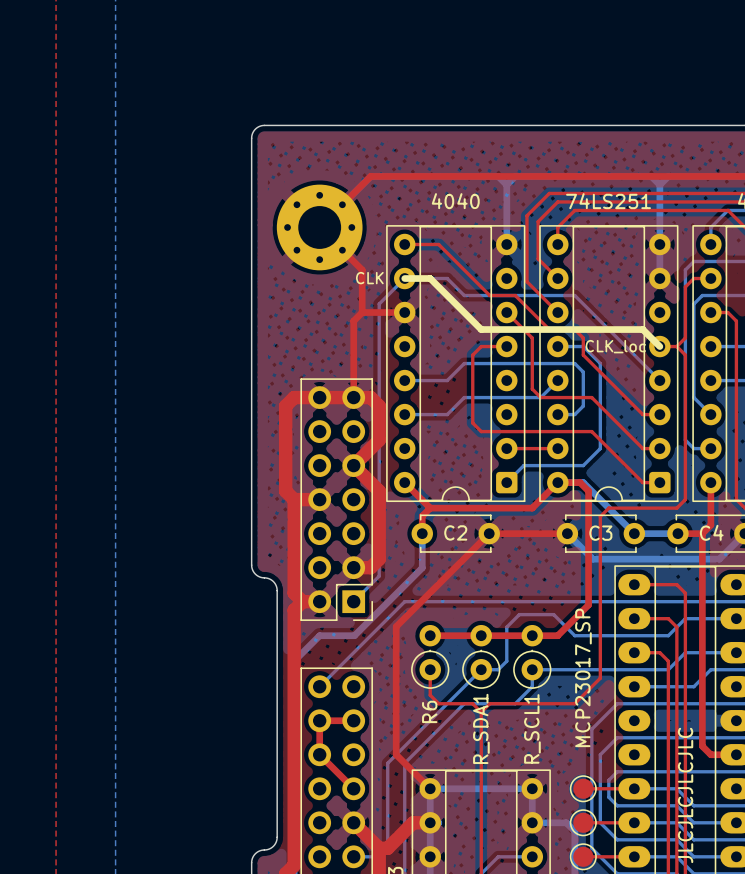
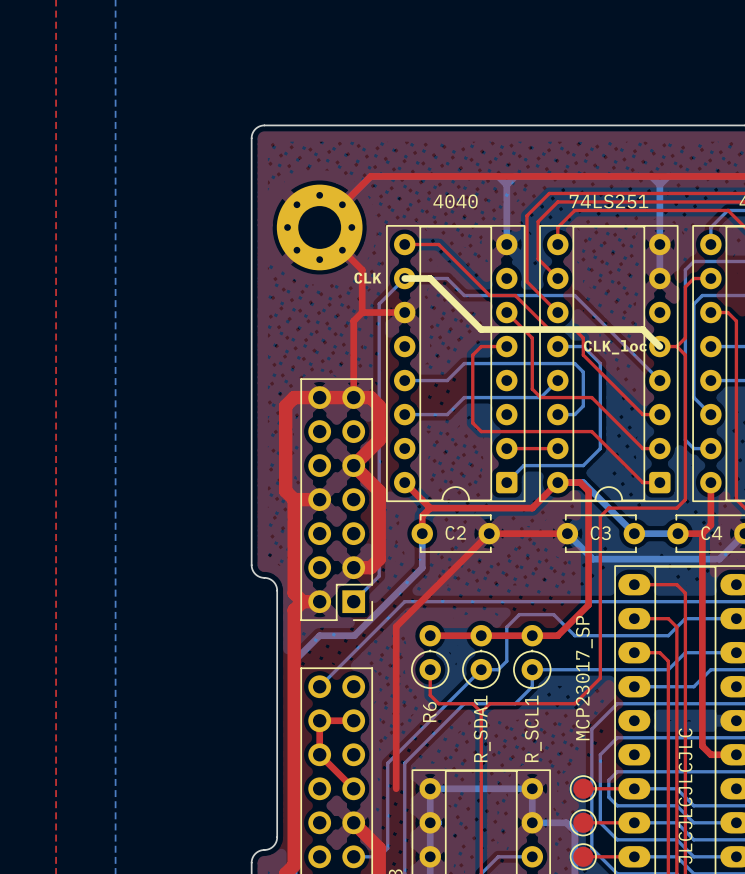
top track: (396, 754) (430, 788) -> (396, 754) (396, 788)
top track: (430, 822) (413, 822) (387, 848) (379, 848) -> none

